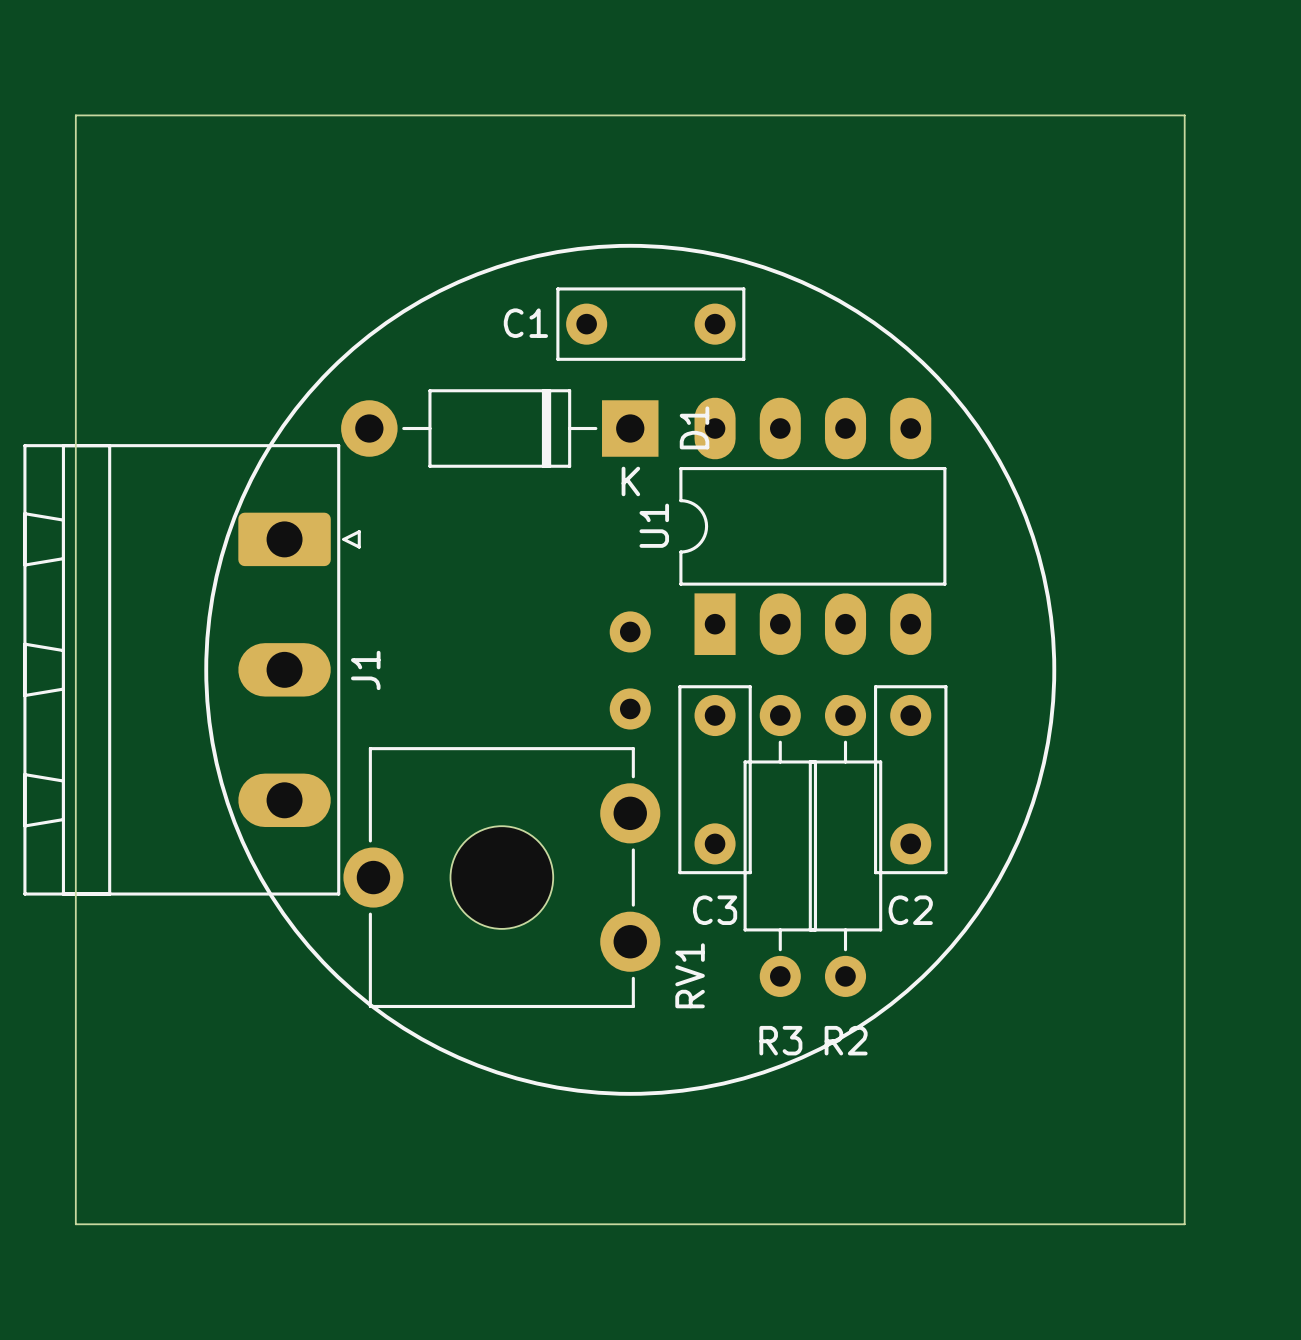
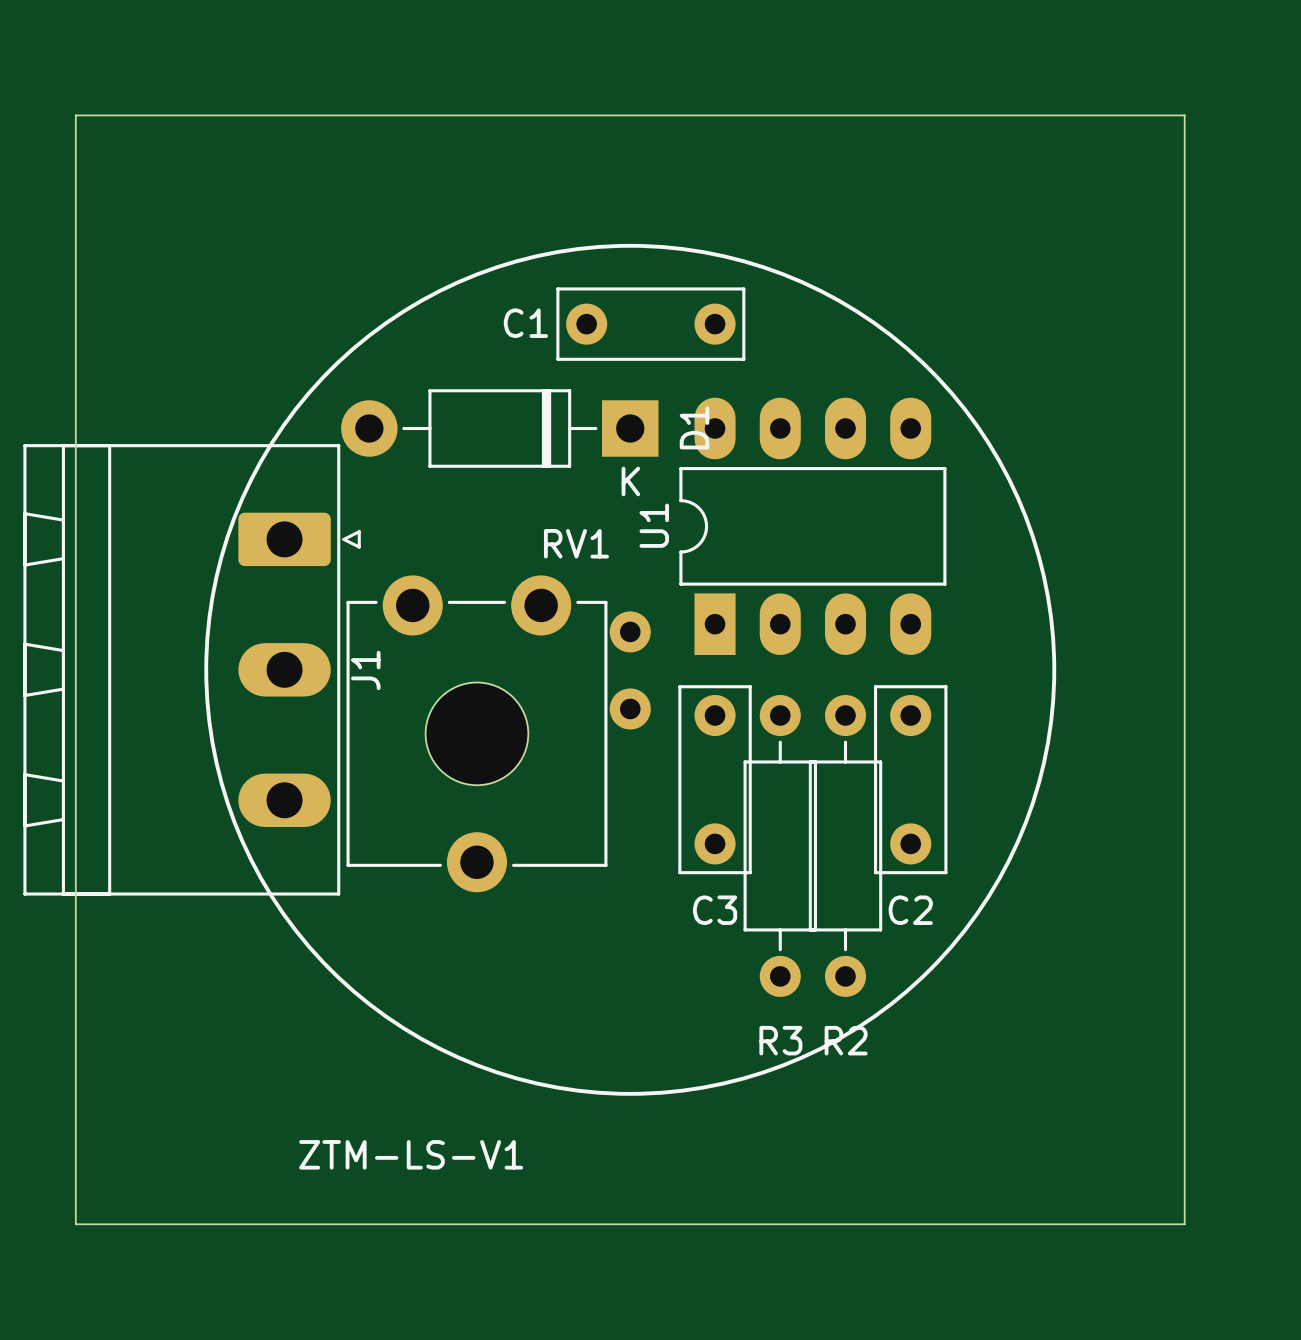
RV1 rotation: 0° (501, 877) -> 90° counterclockwise (476, 733)
text: none -> ZTM-LS-V1 (411, 1154)

